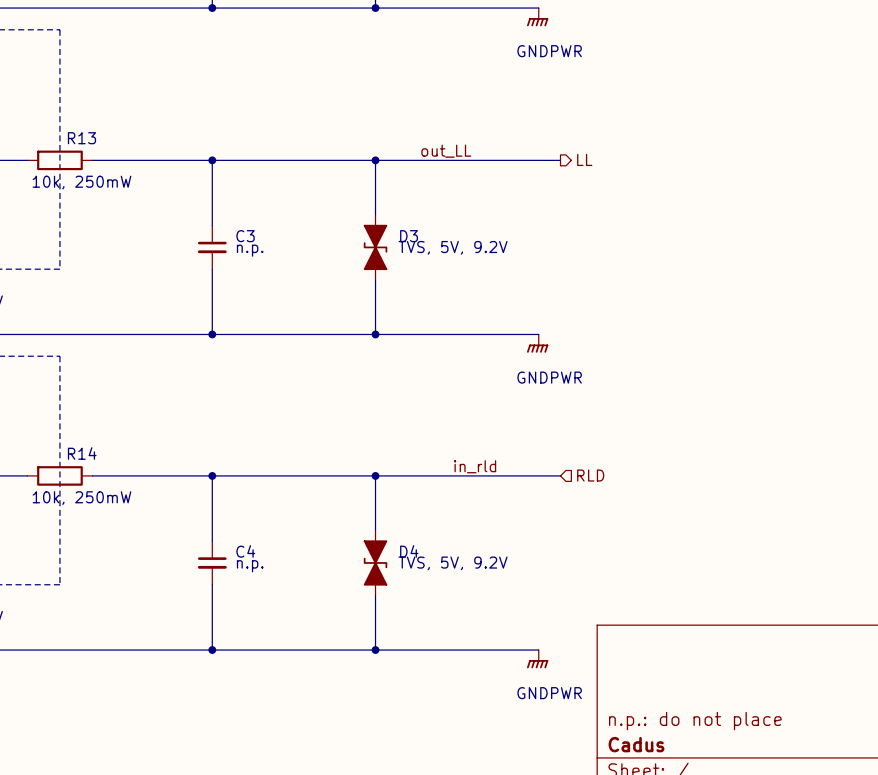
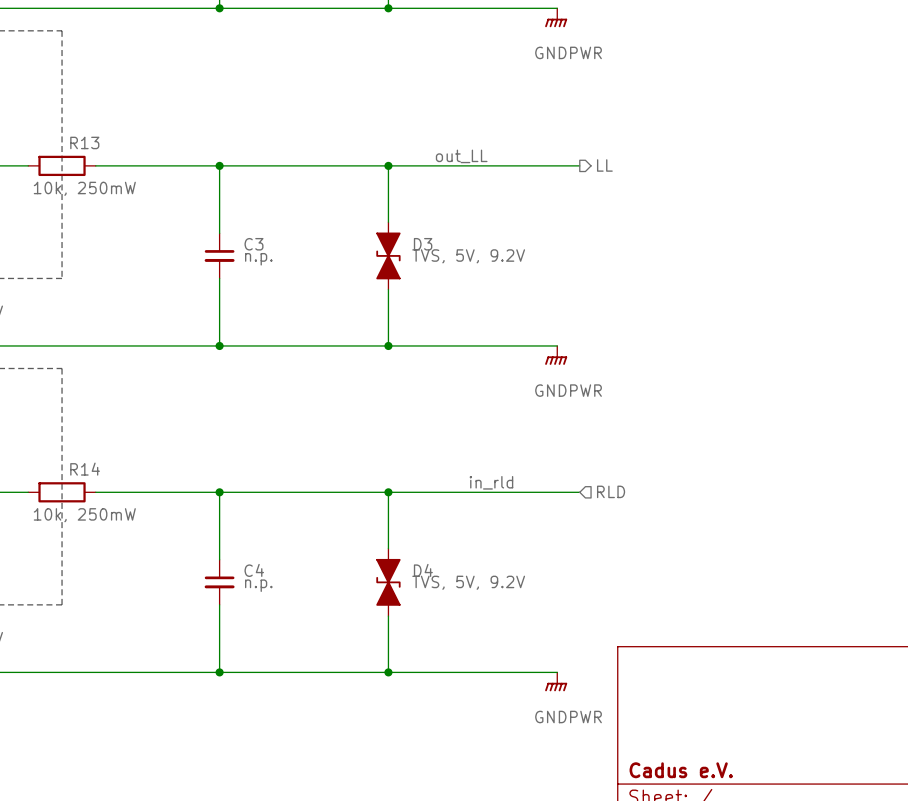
title block: n.p.: do not place (695, 721) -> none
title block: Cadus (636, 744) -> Cadus e.V. (681, 770)

